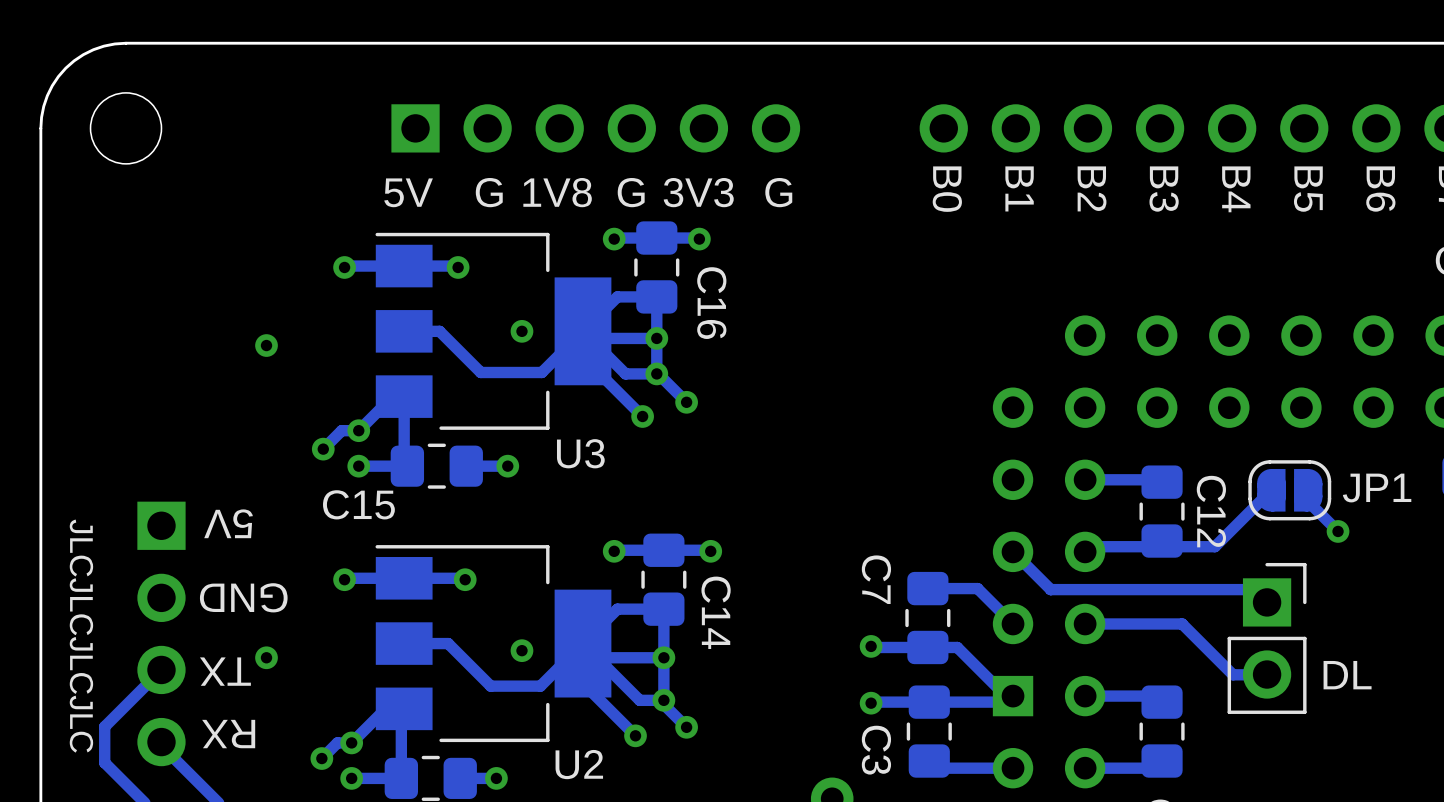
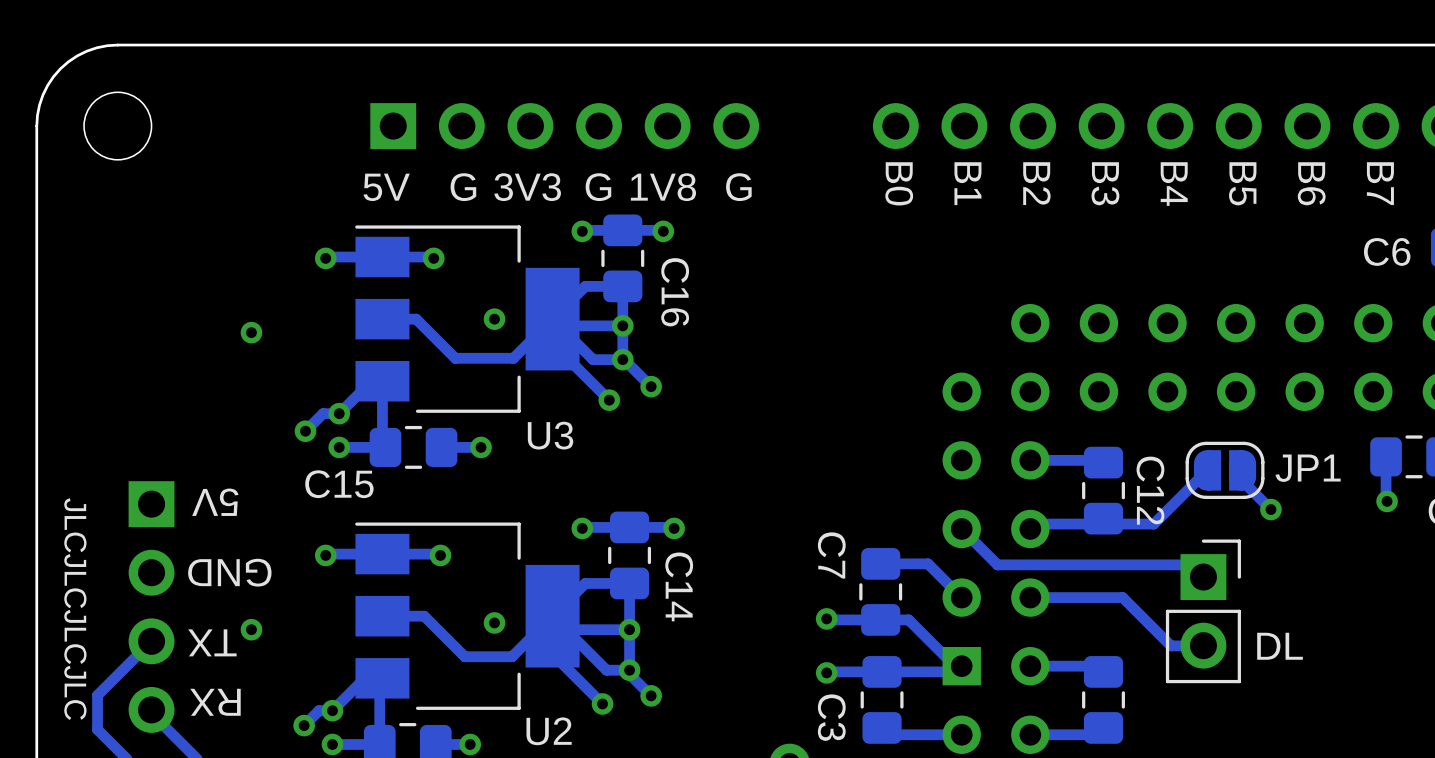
text: 1V8 (557, 192) -> 3V3 (527, 187)
text: 3V3 (698, 192) -> 1V8 (663, 187)

